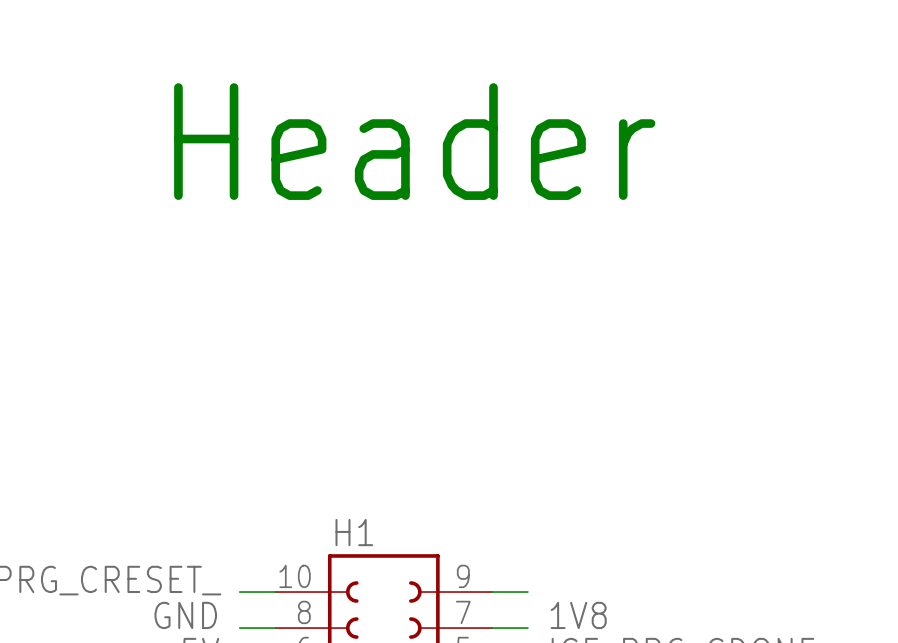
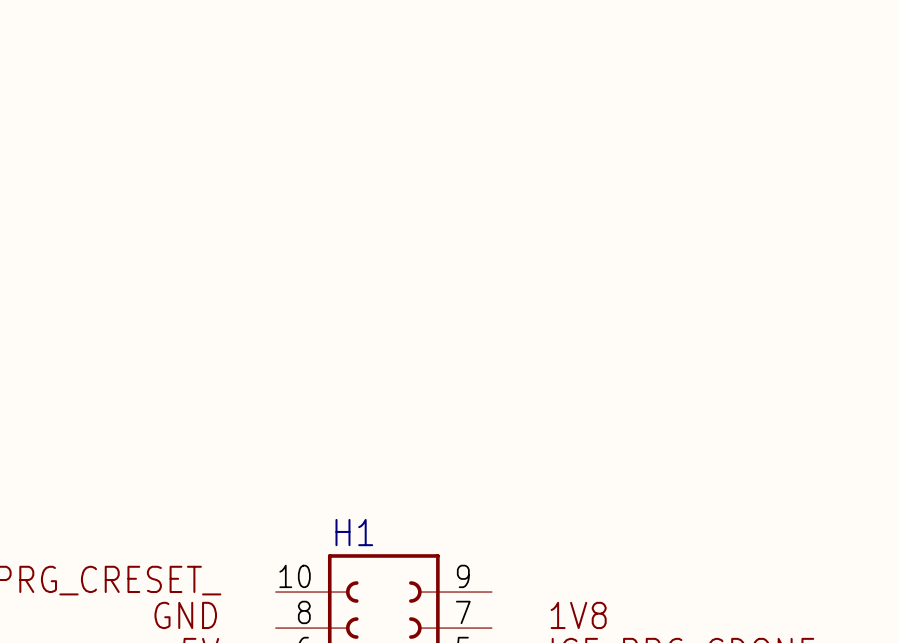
text: Header (414, 141) -> none
wire: (239, 592) (275, 592) -> none
wire: (491, 592) (527, 592) -> none
wire: (239, 628) (275, 628) -> none
wire: (491, 628) (527, 628) -> none

